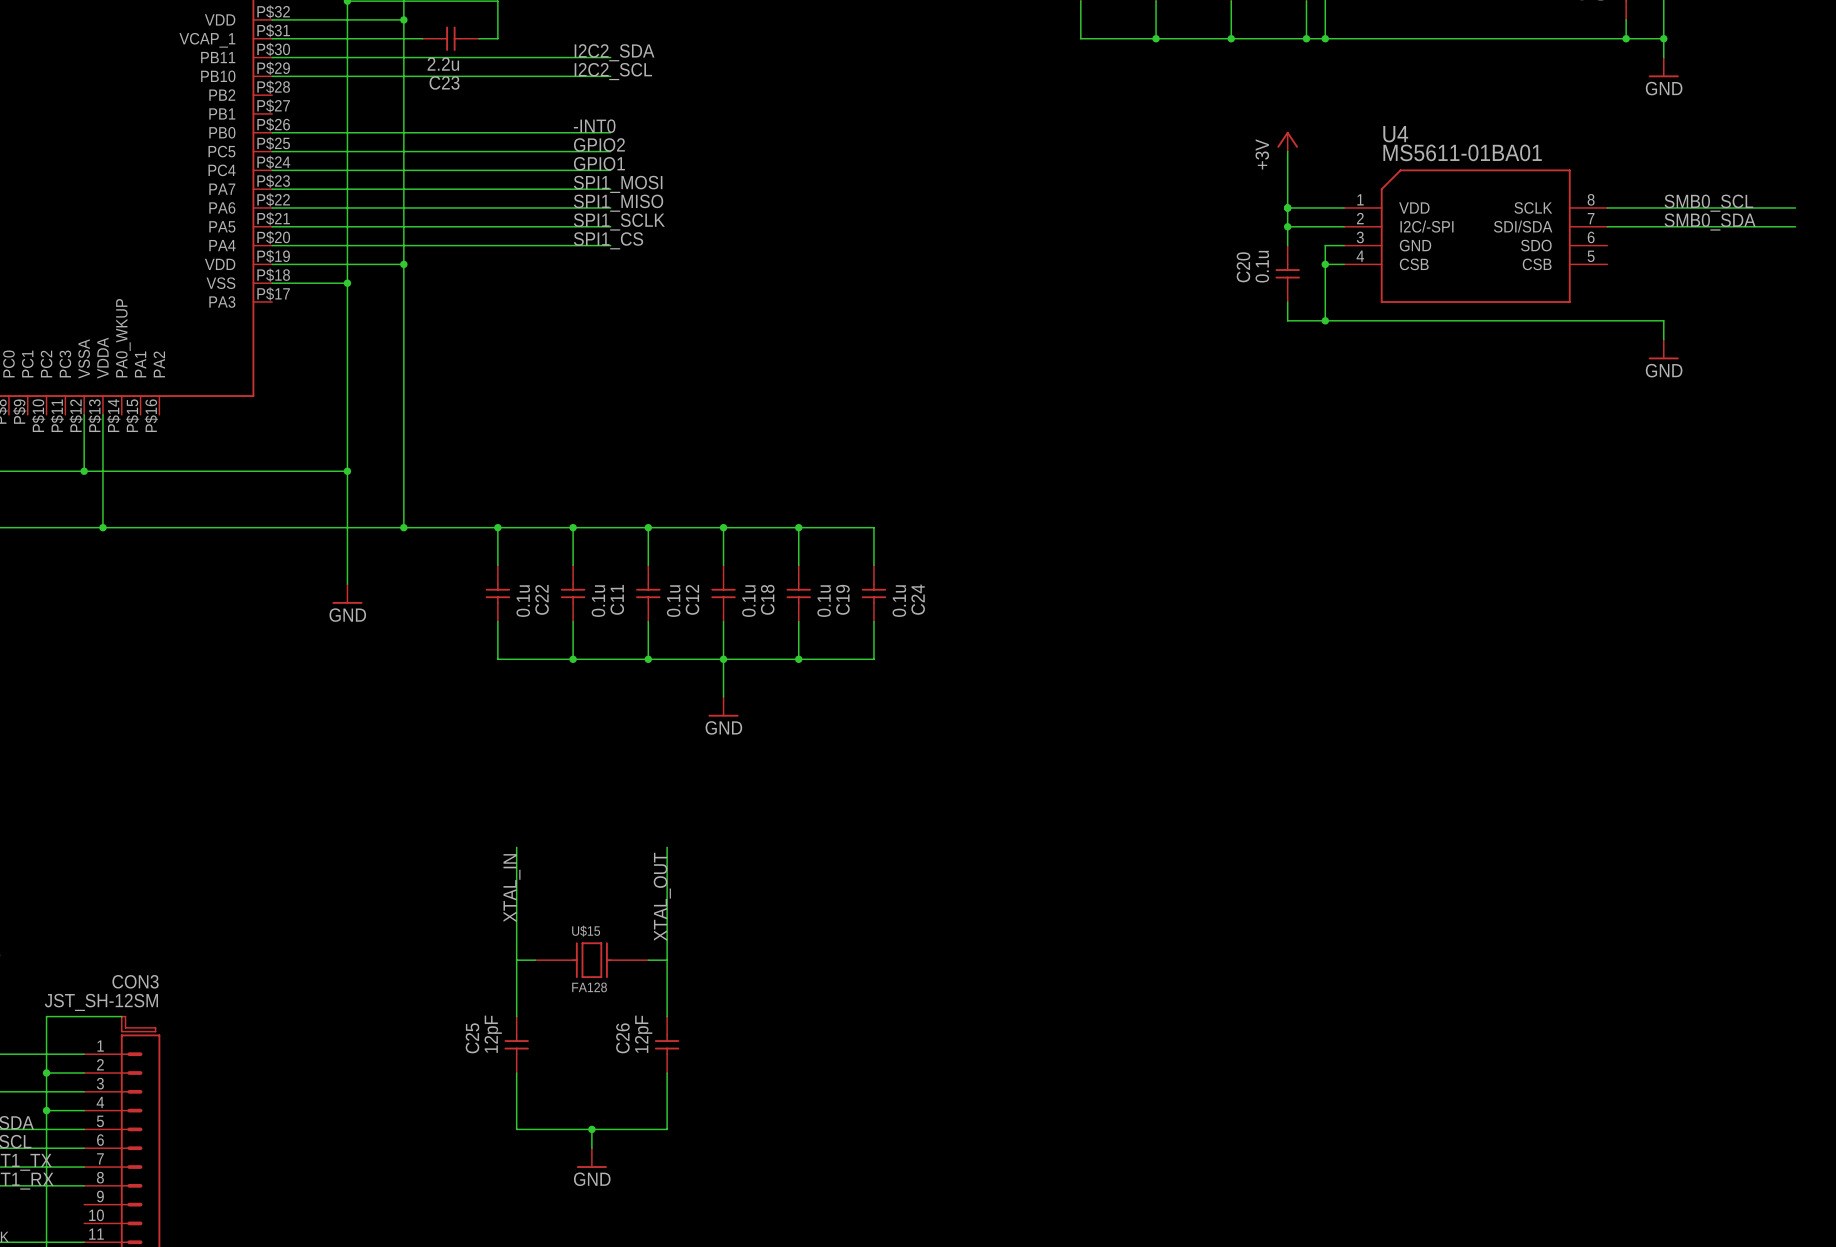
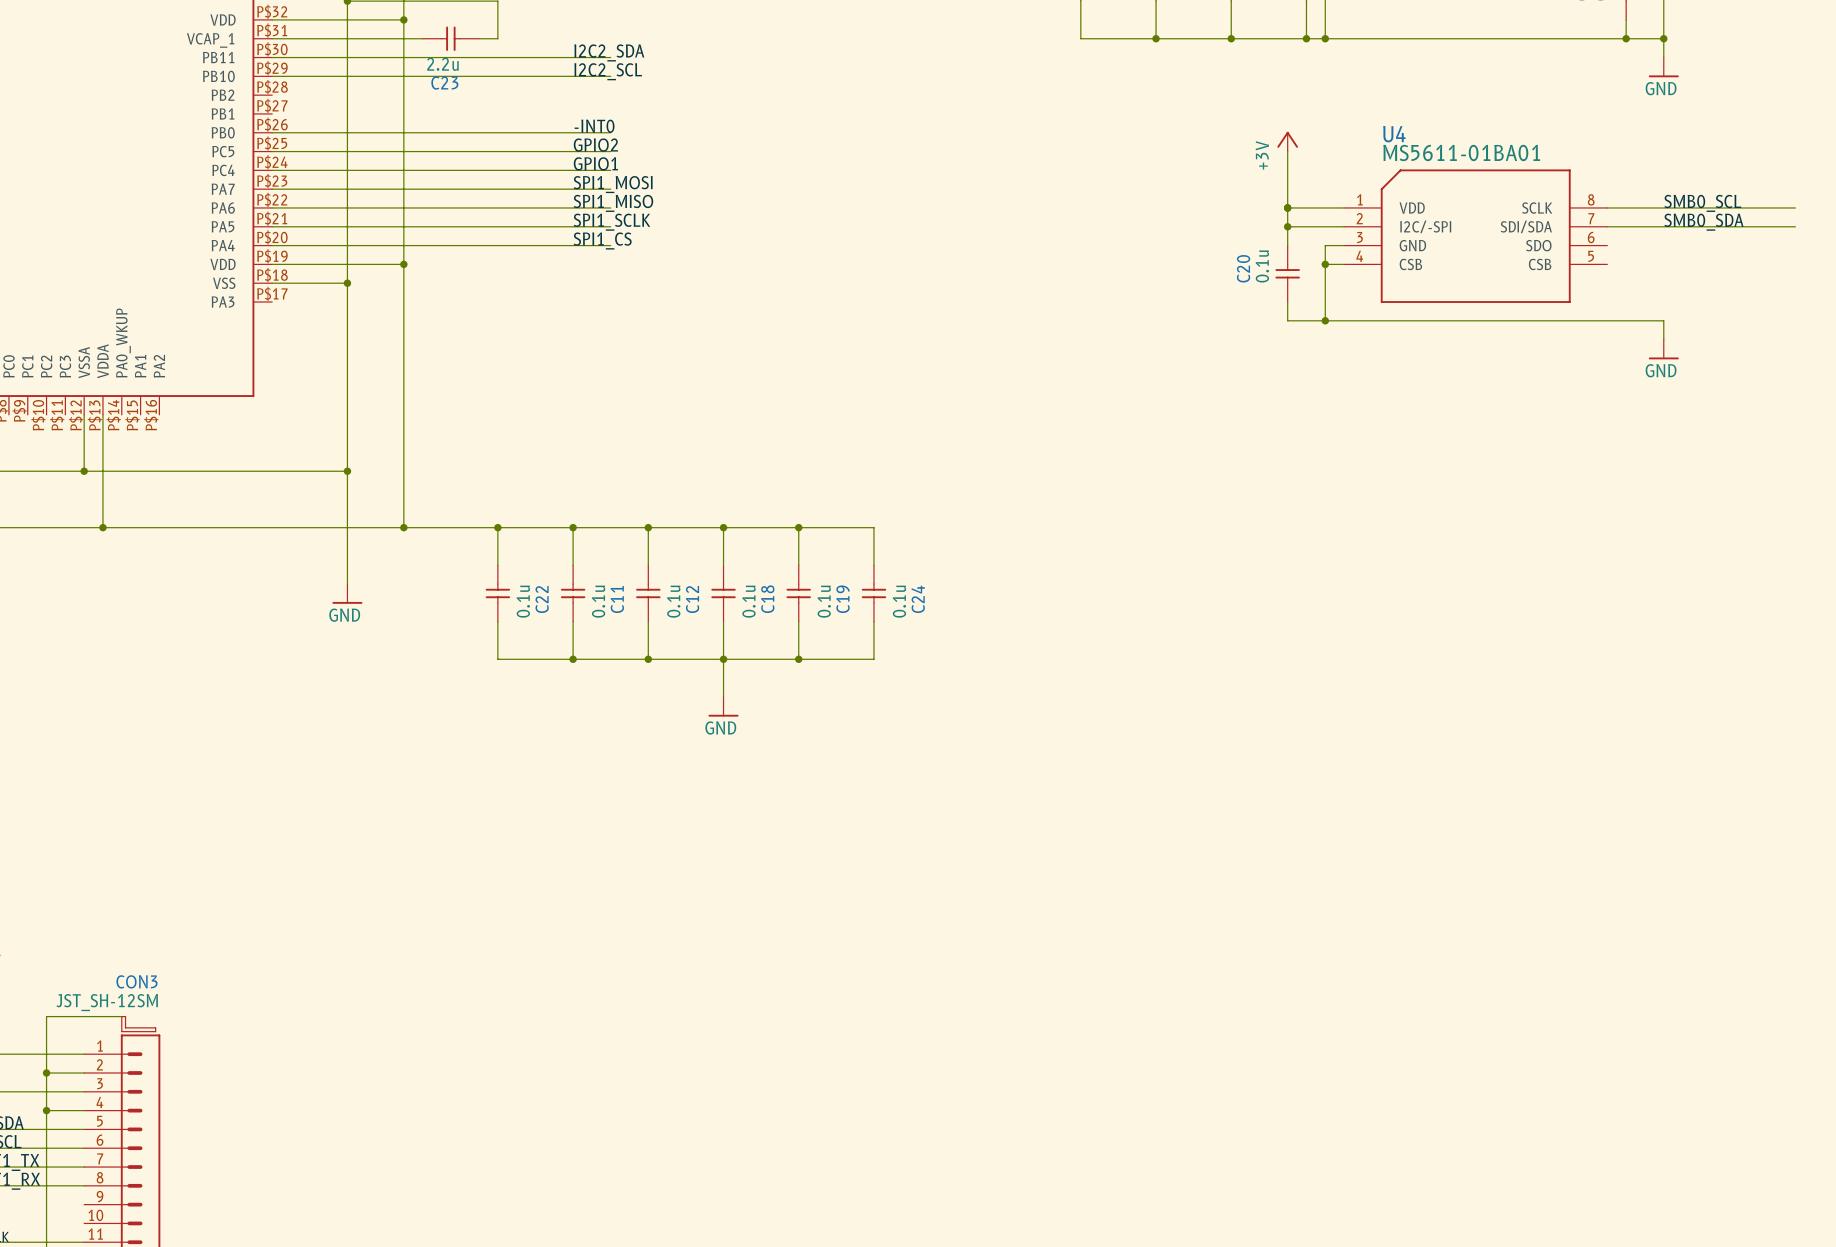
wire: (516, 847) (516, 1016) -> none
wire: (667, 847) (667, 1016) -> none
label: XTAL_IN (511, 888) -> none
label: XTAL_OUT (662, 896) -> none
wire: (516, 960) (535, 960) -> none
U$15: FA128 (591, 960) -> none
wire: (648, 960) (667, 960) -> none
C25: 12pF (516, 1044) -> none
C26: 12pF (667, 1044) -> none
wire: (516, 1073) (516, 1129) (667, 1129) (667, 1073) -> none
wire: (591, 1129) (591, 1148) -> none
junction: (591, 1129) -> none
power symbol: GND (591, 1158) -> none

